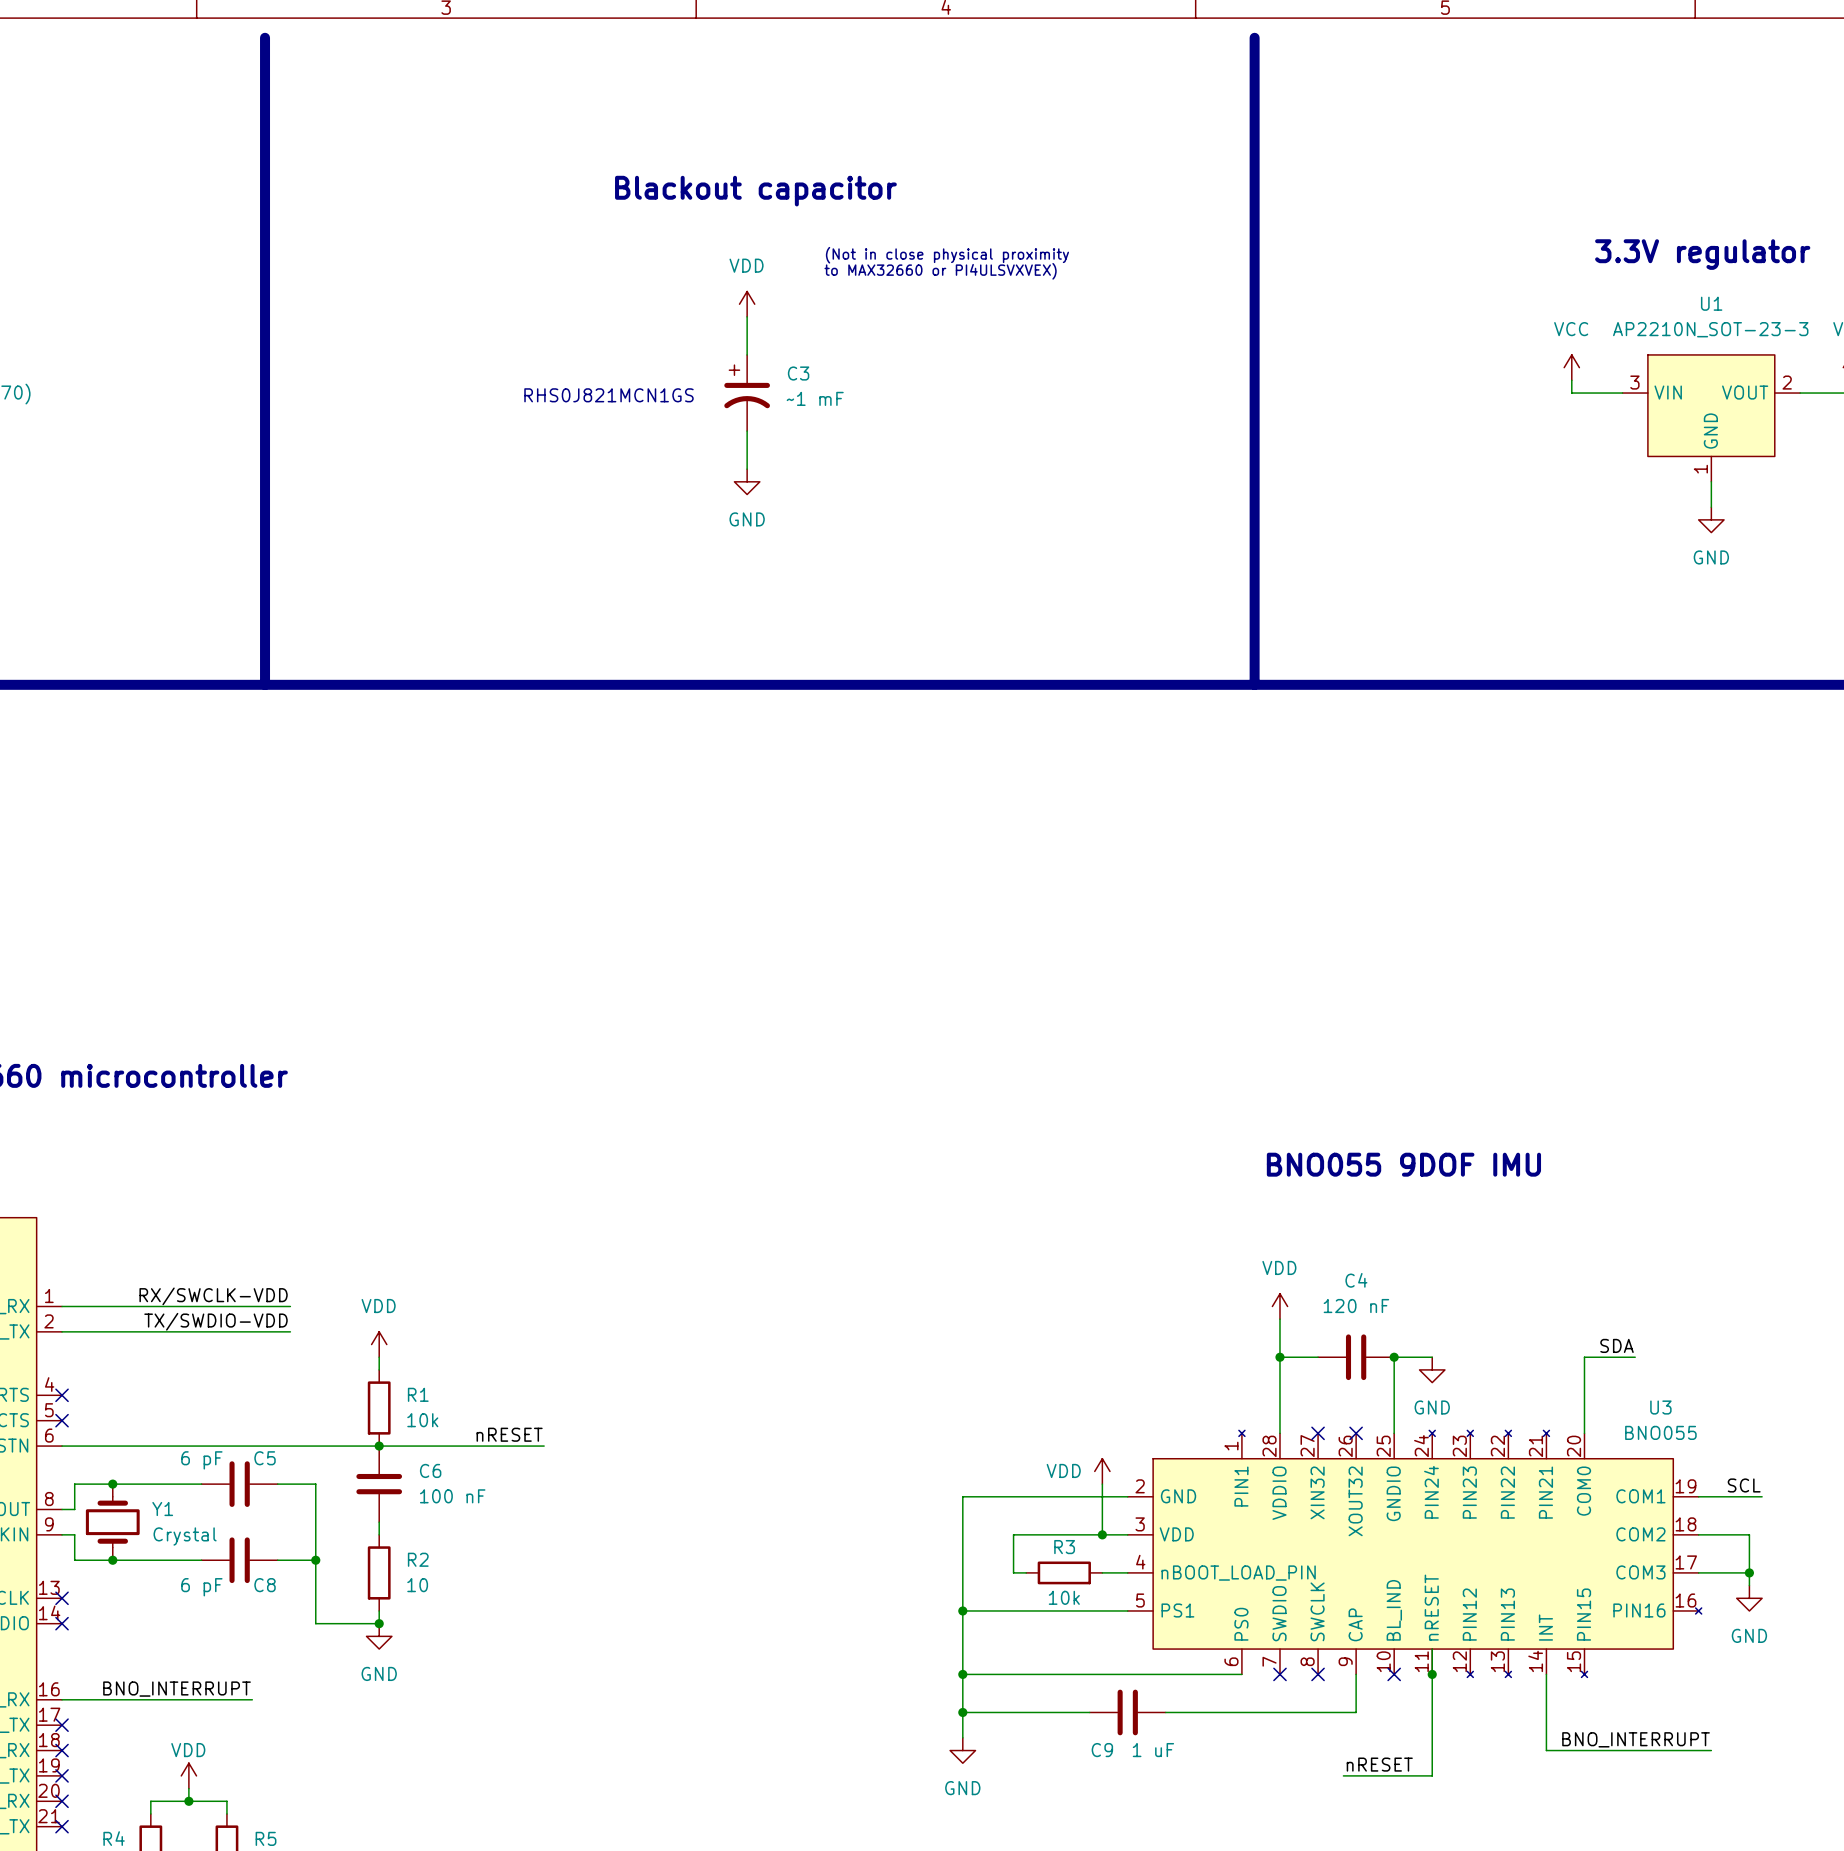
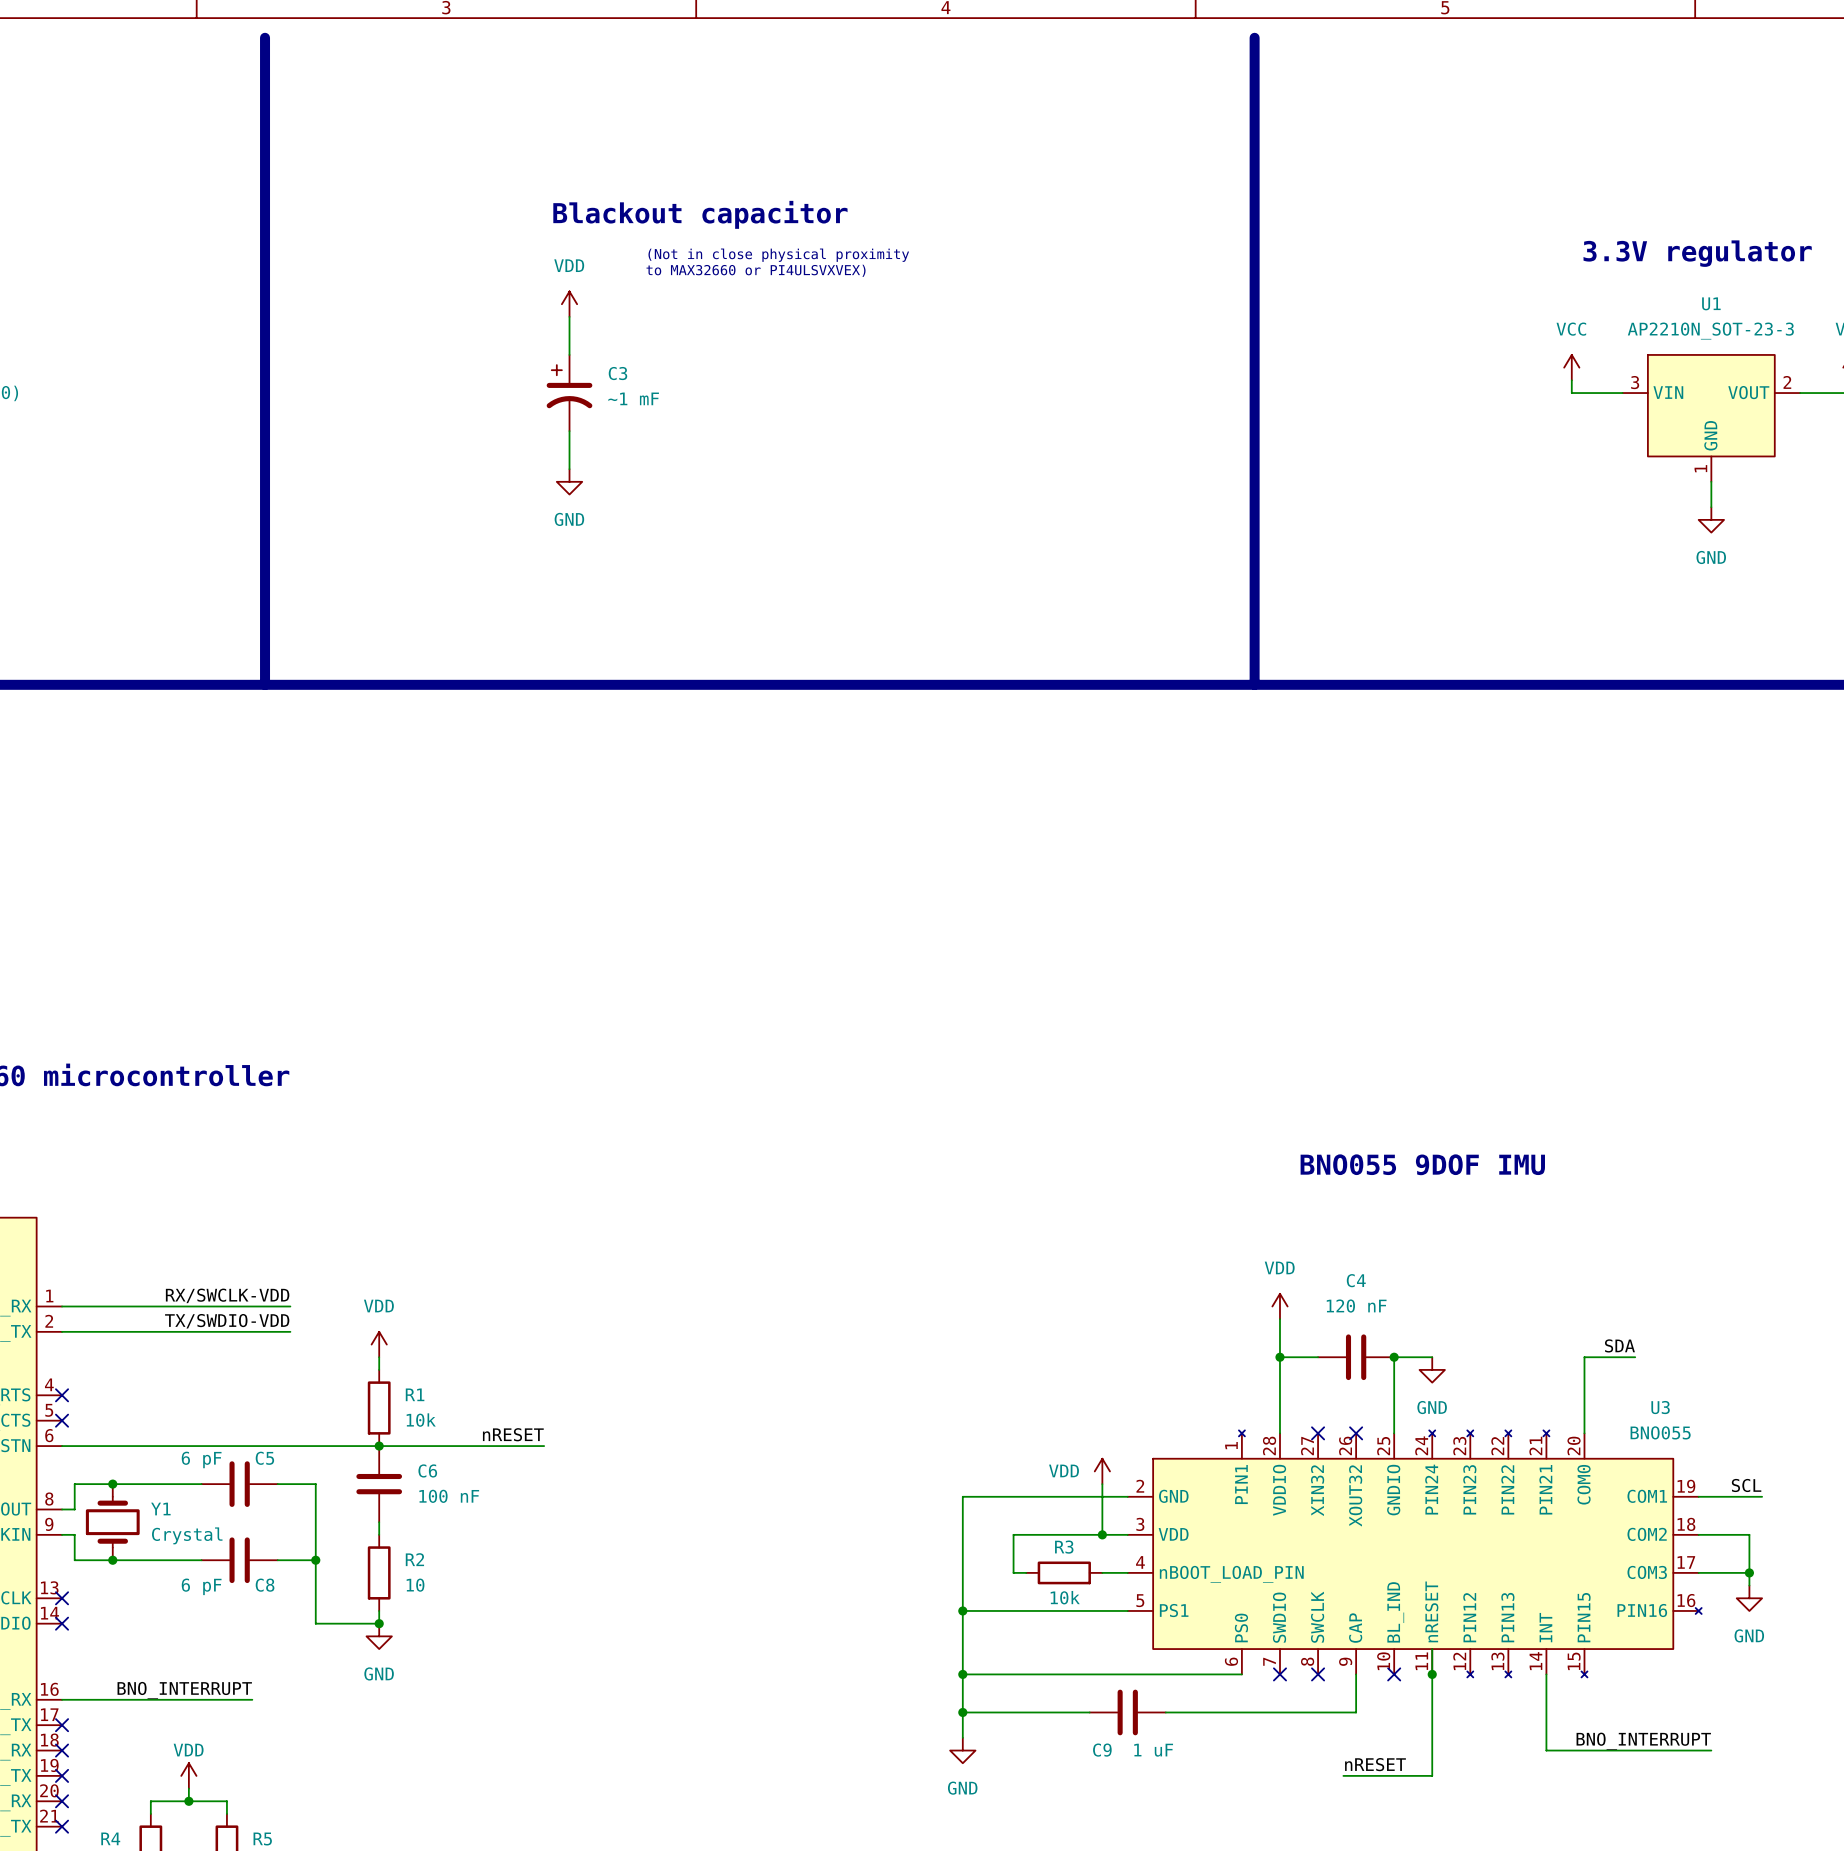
text position: Blackout capacitor (755, 191) -> Blackout capacitor (700, 214)
text position: (Not in close physical proximity (947, 255) -> (Not in close physical proximity (778, 255)
text position: to MAX32660 or PI4ULSVXVEX) (940, 271) -> to MAX32660 or PI4ULSVXVEX) (756, 270)
power symbol position: VDD (747, 304) -> VDD (569, 304)
wire: (747, 316) (747, 354) -> (569, 316) (569, 354)
C3 position: (747, 393) -> (569, 393)
text: RHS0J821MCN1GS (608, 395) -> none
wire: (747, 431) (747, 469) -> (569, 431) (569, 469)
power symbol position: GND (747, 481) -> GND (569, 481)

